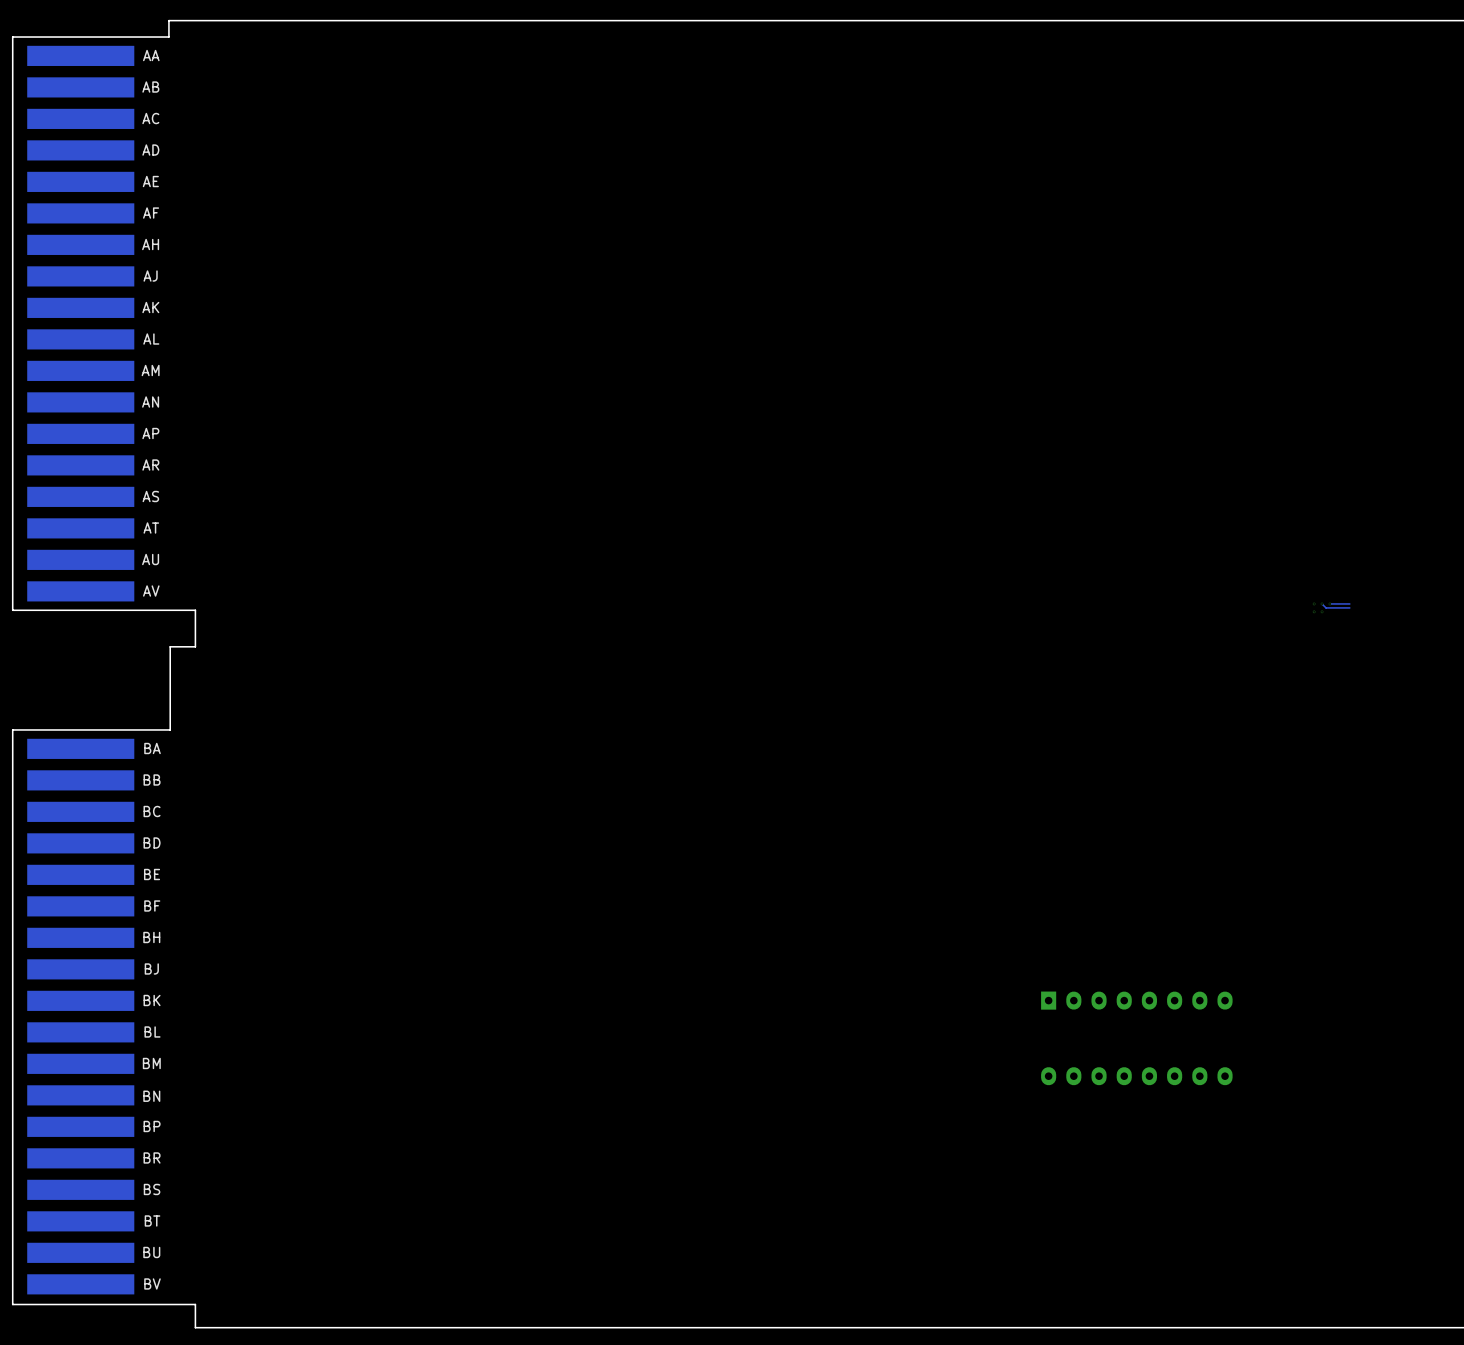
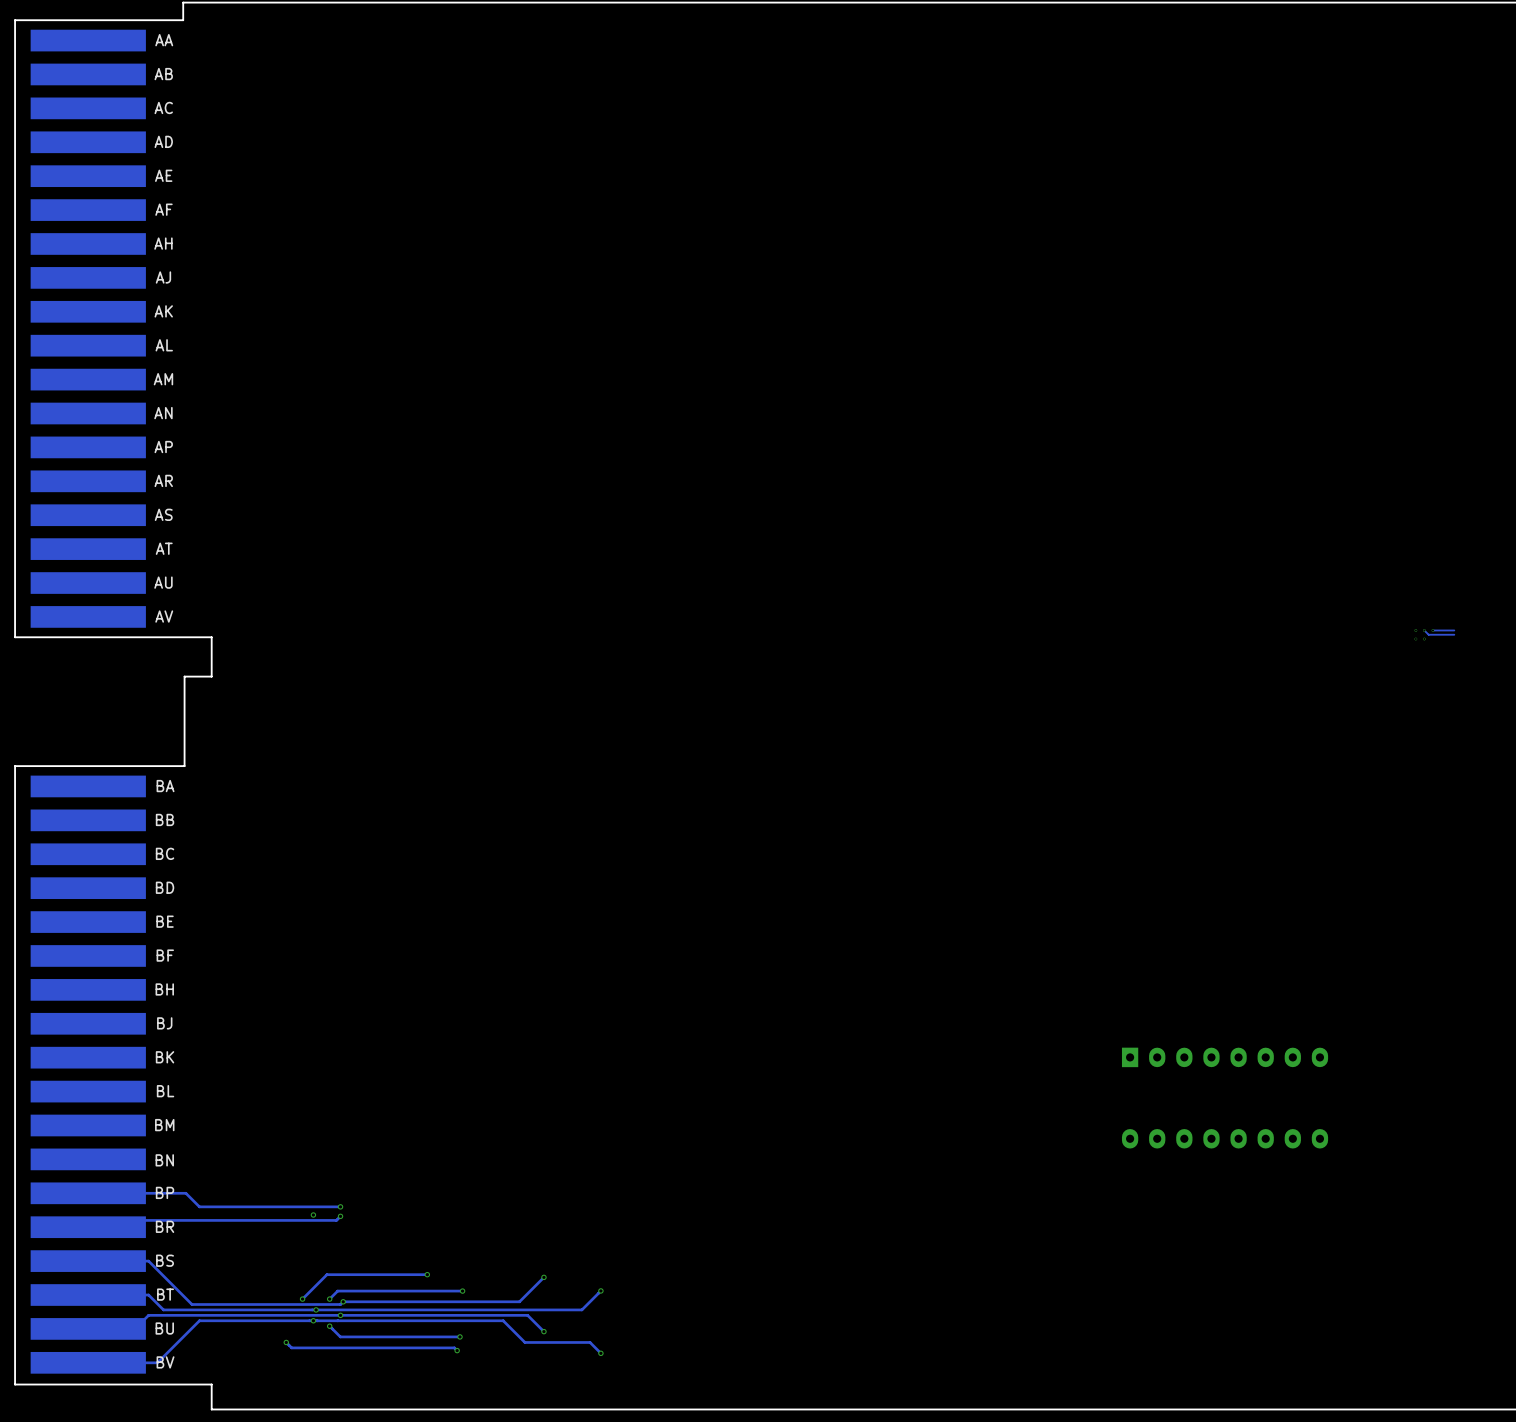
track: none -> (88, 1193) (185, 1193) (199, 1206) (340, 1206)
via: none -> (340, 1206)
via: none -> (313, 1215)
track: none -> (340, 1216) (336, 1220) (95, 1220) (88, 1227)
via: none -> (340, 1216)
track: none -> (88, 1261) (148, 1261) (192, 1304) (519, 1301) (543, 1277)
track: none -> (427, 1274) (326, 1274) (302, 1299)
via: none -> (427, 1274)
via: none -> (543, 1277)
track: none -> (462, 1291) (337, 1291) (329, 1299)
via: none -> (462, 1291)
track: none -> (600, 1290) (581, 1309) (163, 1309) (148, 1295) (88, 1295)
via: none -> (600, 1290)
via: none -> (302, 1299)
via: none -> (329, 1299)
via: none -> (343, 1301)
via: none -> (316, 1309)
via: none -> (340, 1315)
via: none -> (313, 1320)
track: none -> (329, 1326) (340, 1336) (460, 1336)
via: none -> (329, 1326)
track: none -> (88, 1328) (135, 1328) (148, 1315) (527, 1315) (543, 1331)
via: none -> (543, 1331)
via: none -> (460, 1336)
track: none -> (286, 1342) (291, 1347) (454, 1347) (457, 1350)
via: none -> (286, 1342)
via: none -> (457, 1350)
track: none -> (600, 1353) (590, 1342) (524, 1342) (503, 1320) (199, 1320) (157, 1362) (88, 1362)
via: none -> (600, 1353)

